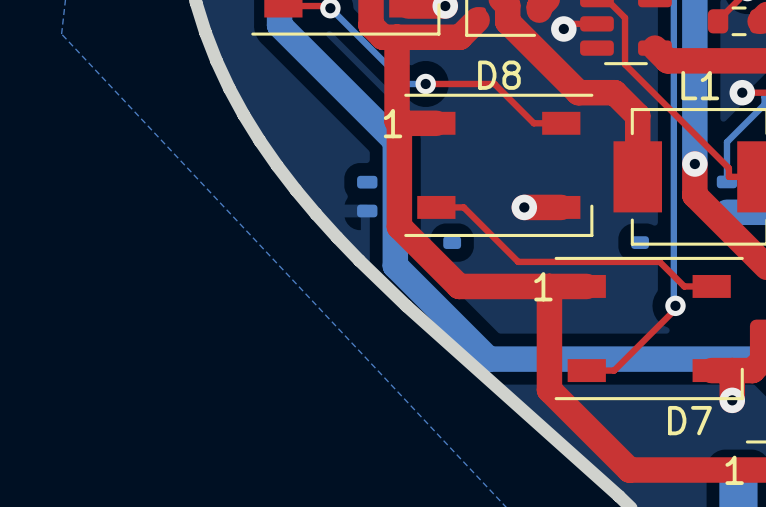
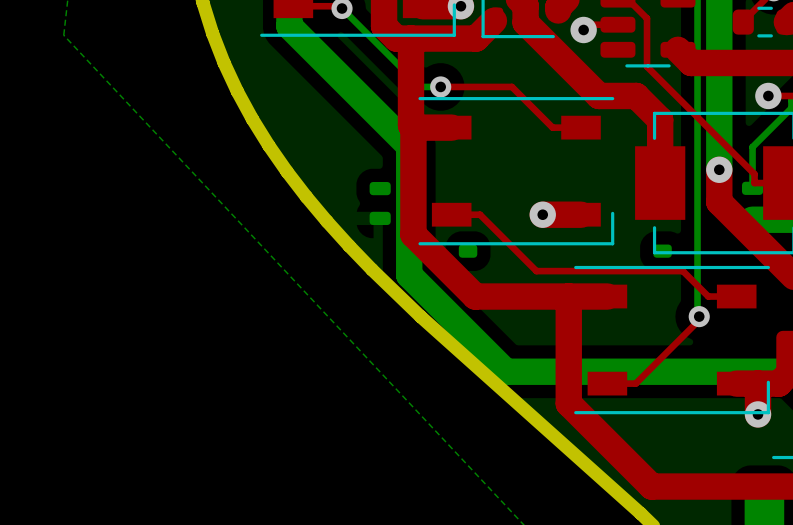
D8 name: D8 (499, 75) -> none
L1 name: L1 (700, 85) -> none
D8 text: 1 (393, 123) -> none
D7 text: 1 (543, 286) -> none
D7 name: D7 (689, 420) -> none
part text: 1 (734, 470) -> none

